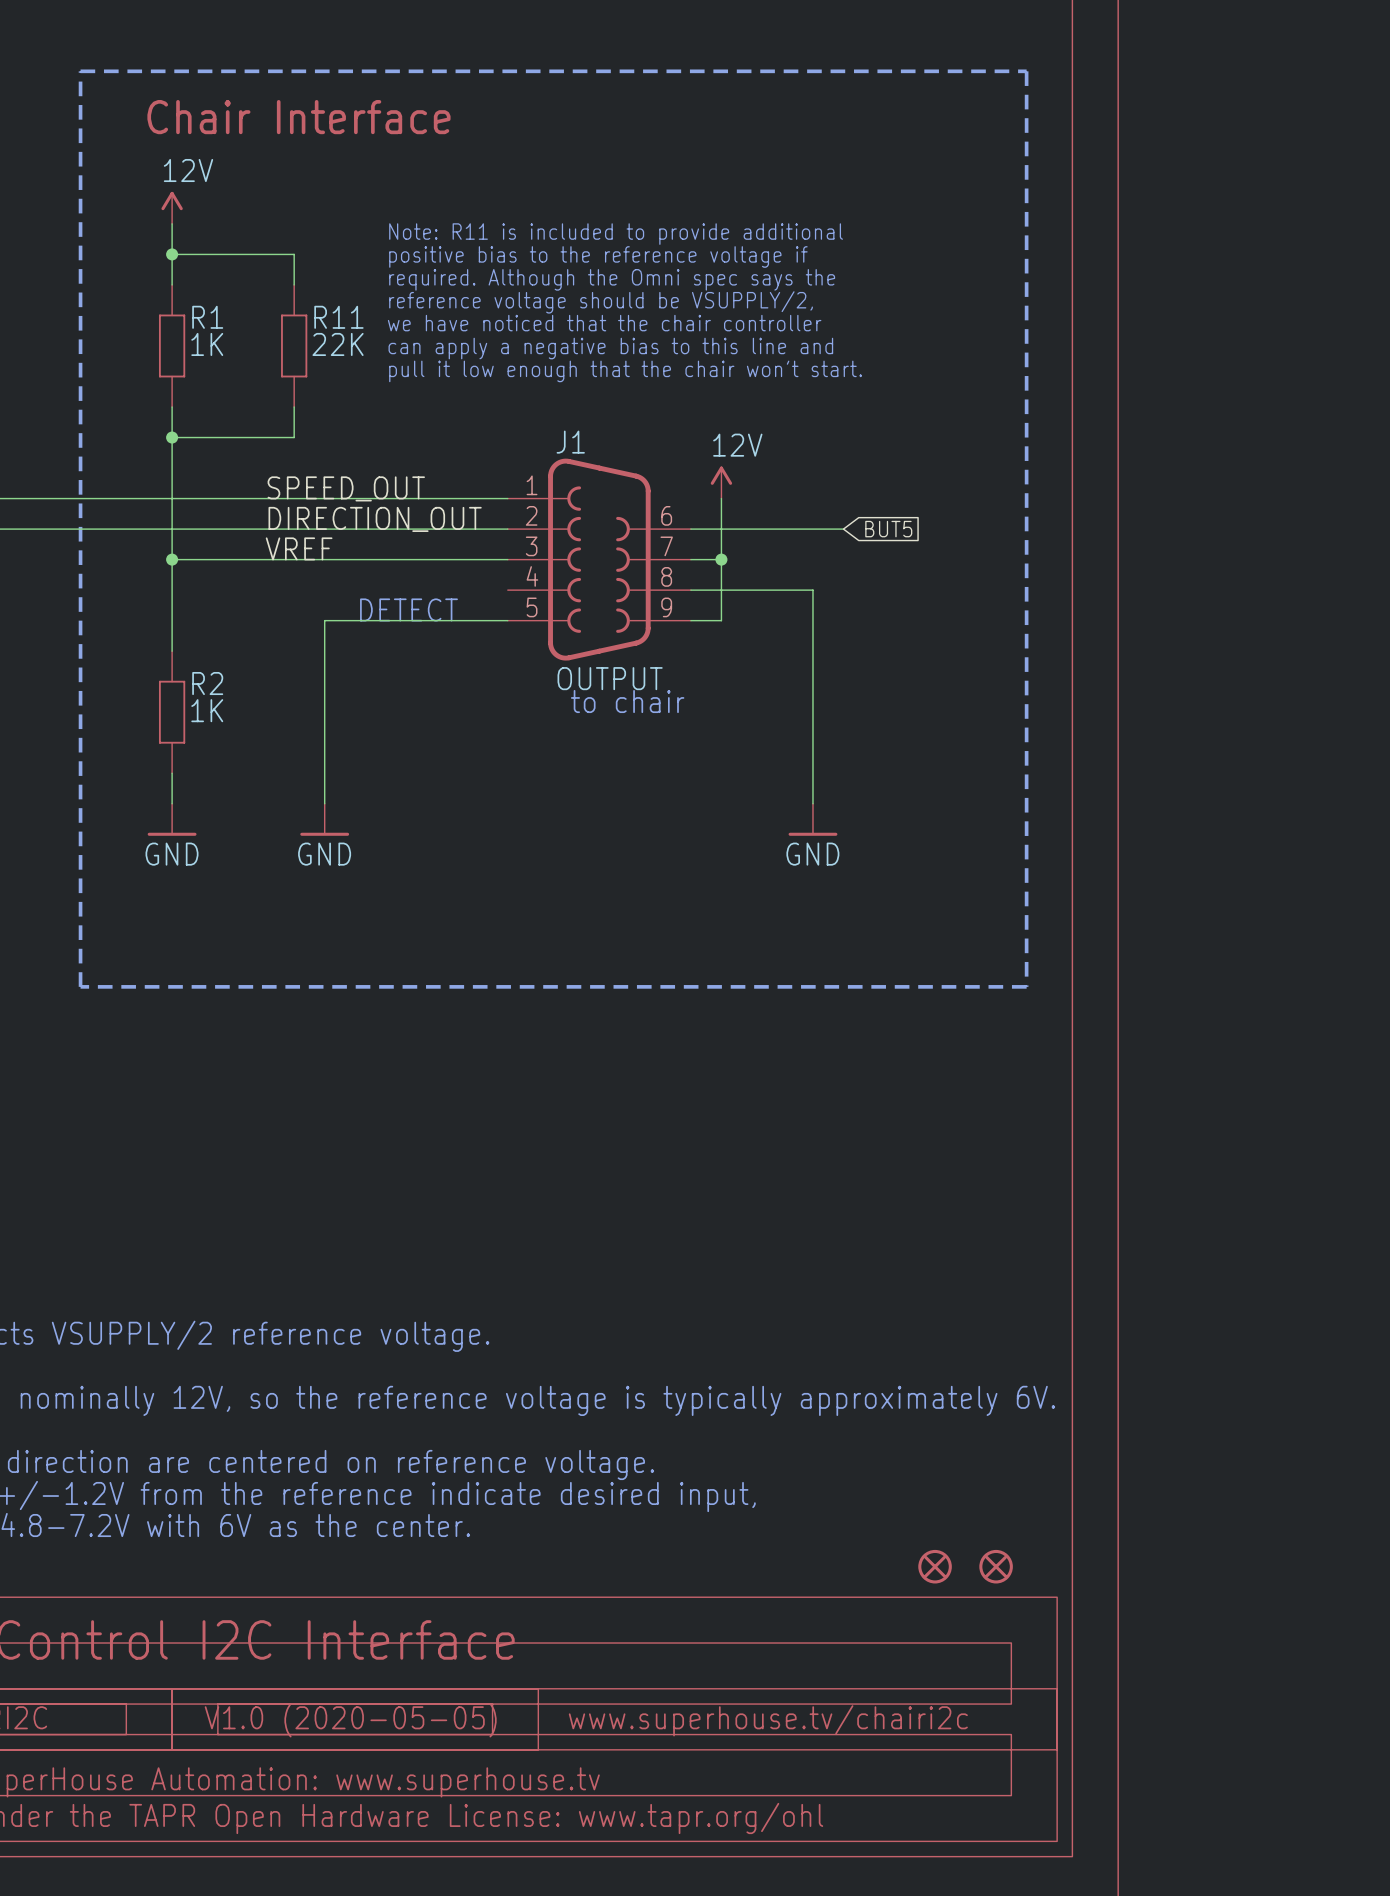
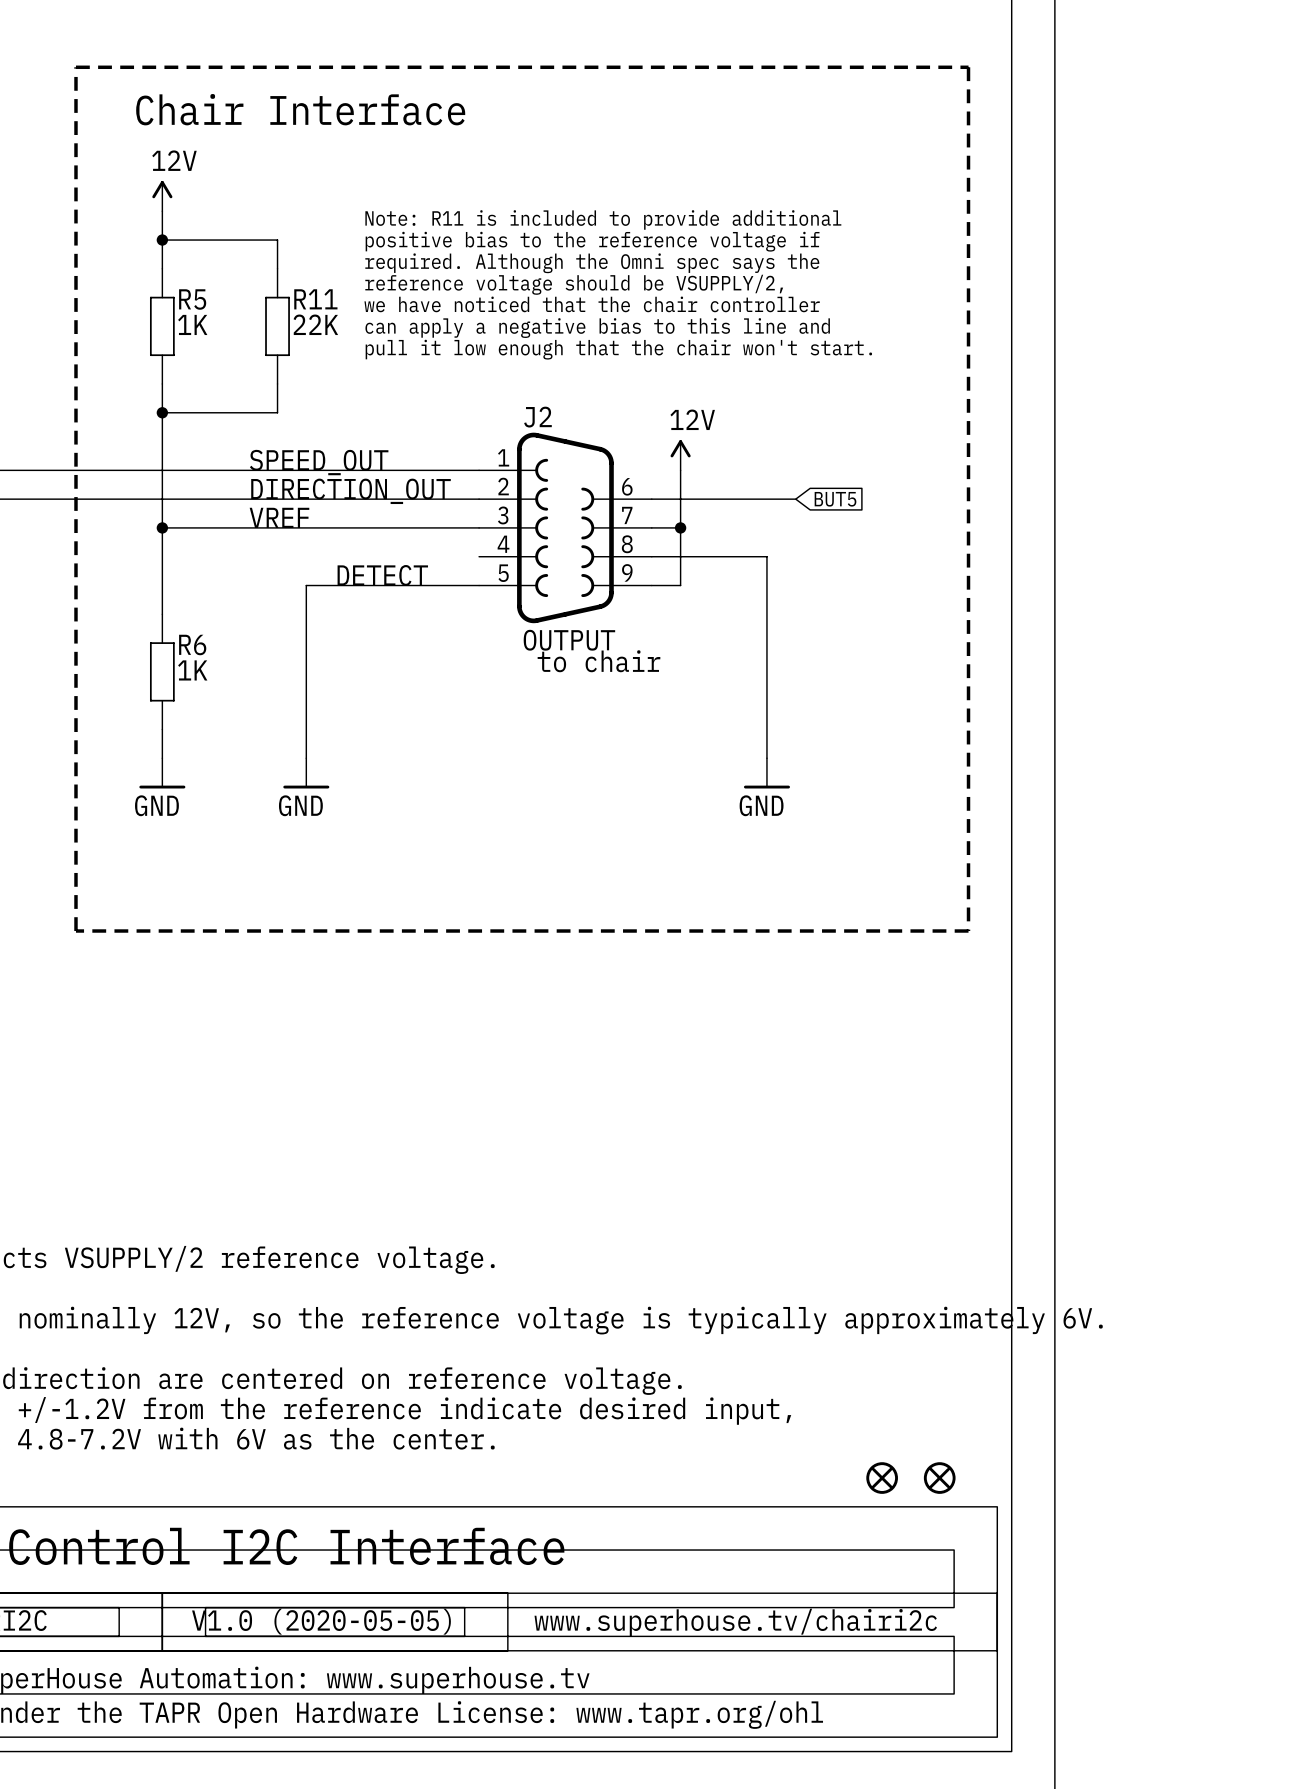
R1 name: R1 (207, 317) -> R5 (192, 299)
J1 name: J1 (570, 442) -> J2 (537, 417)
R2 name: R2 (207, 683) -> R6 (192, 645)

